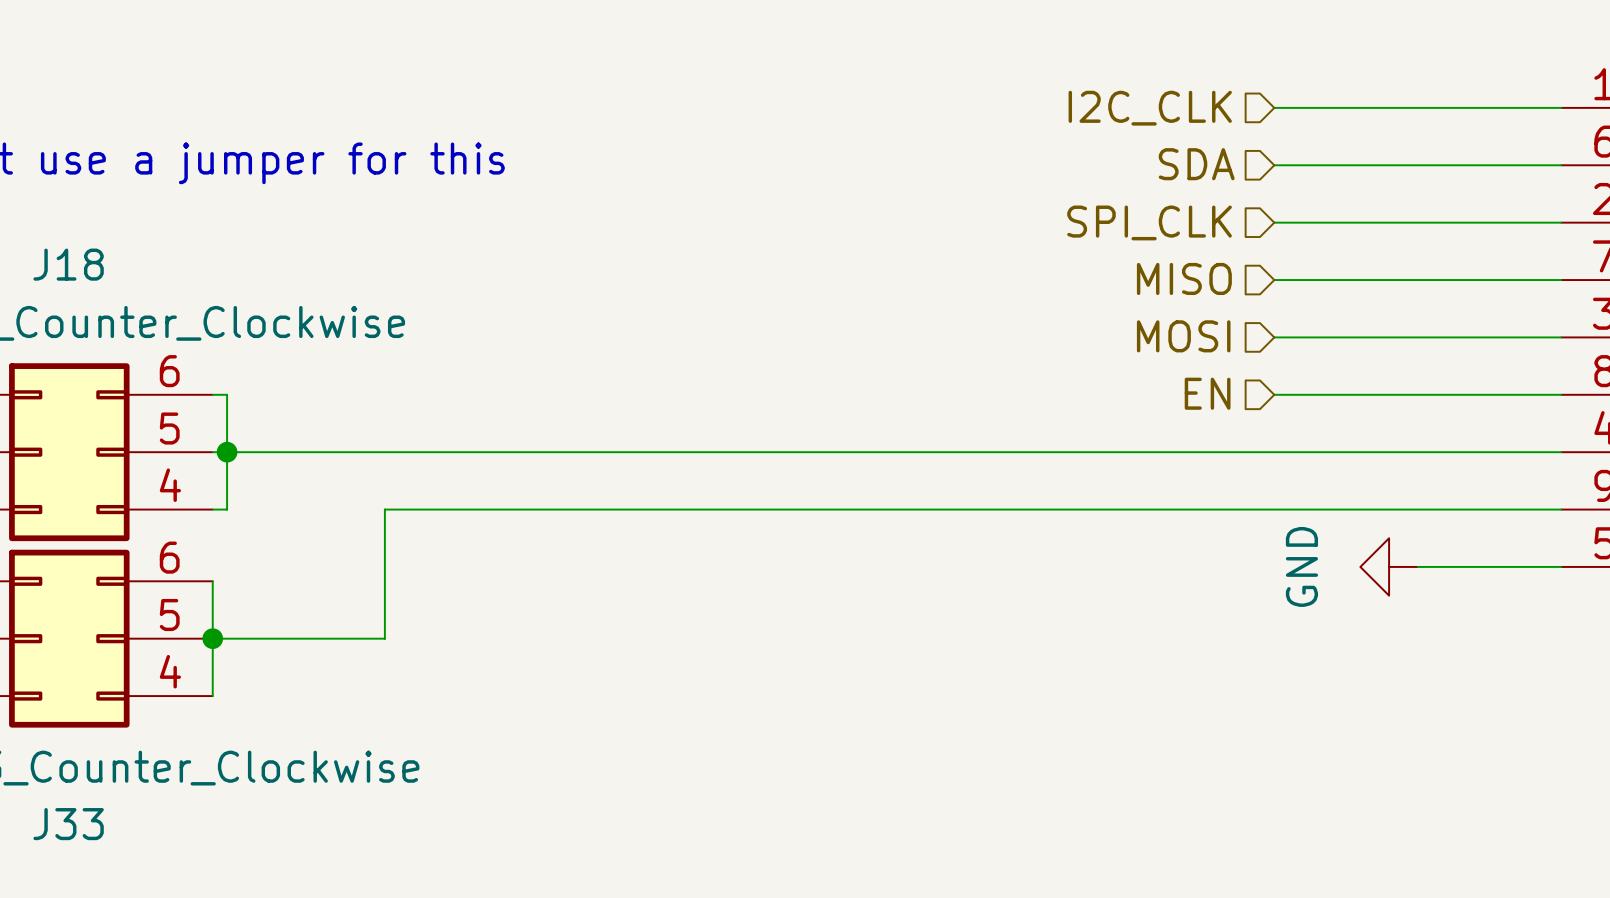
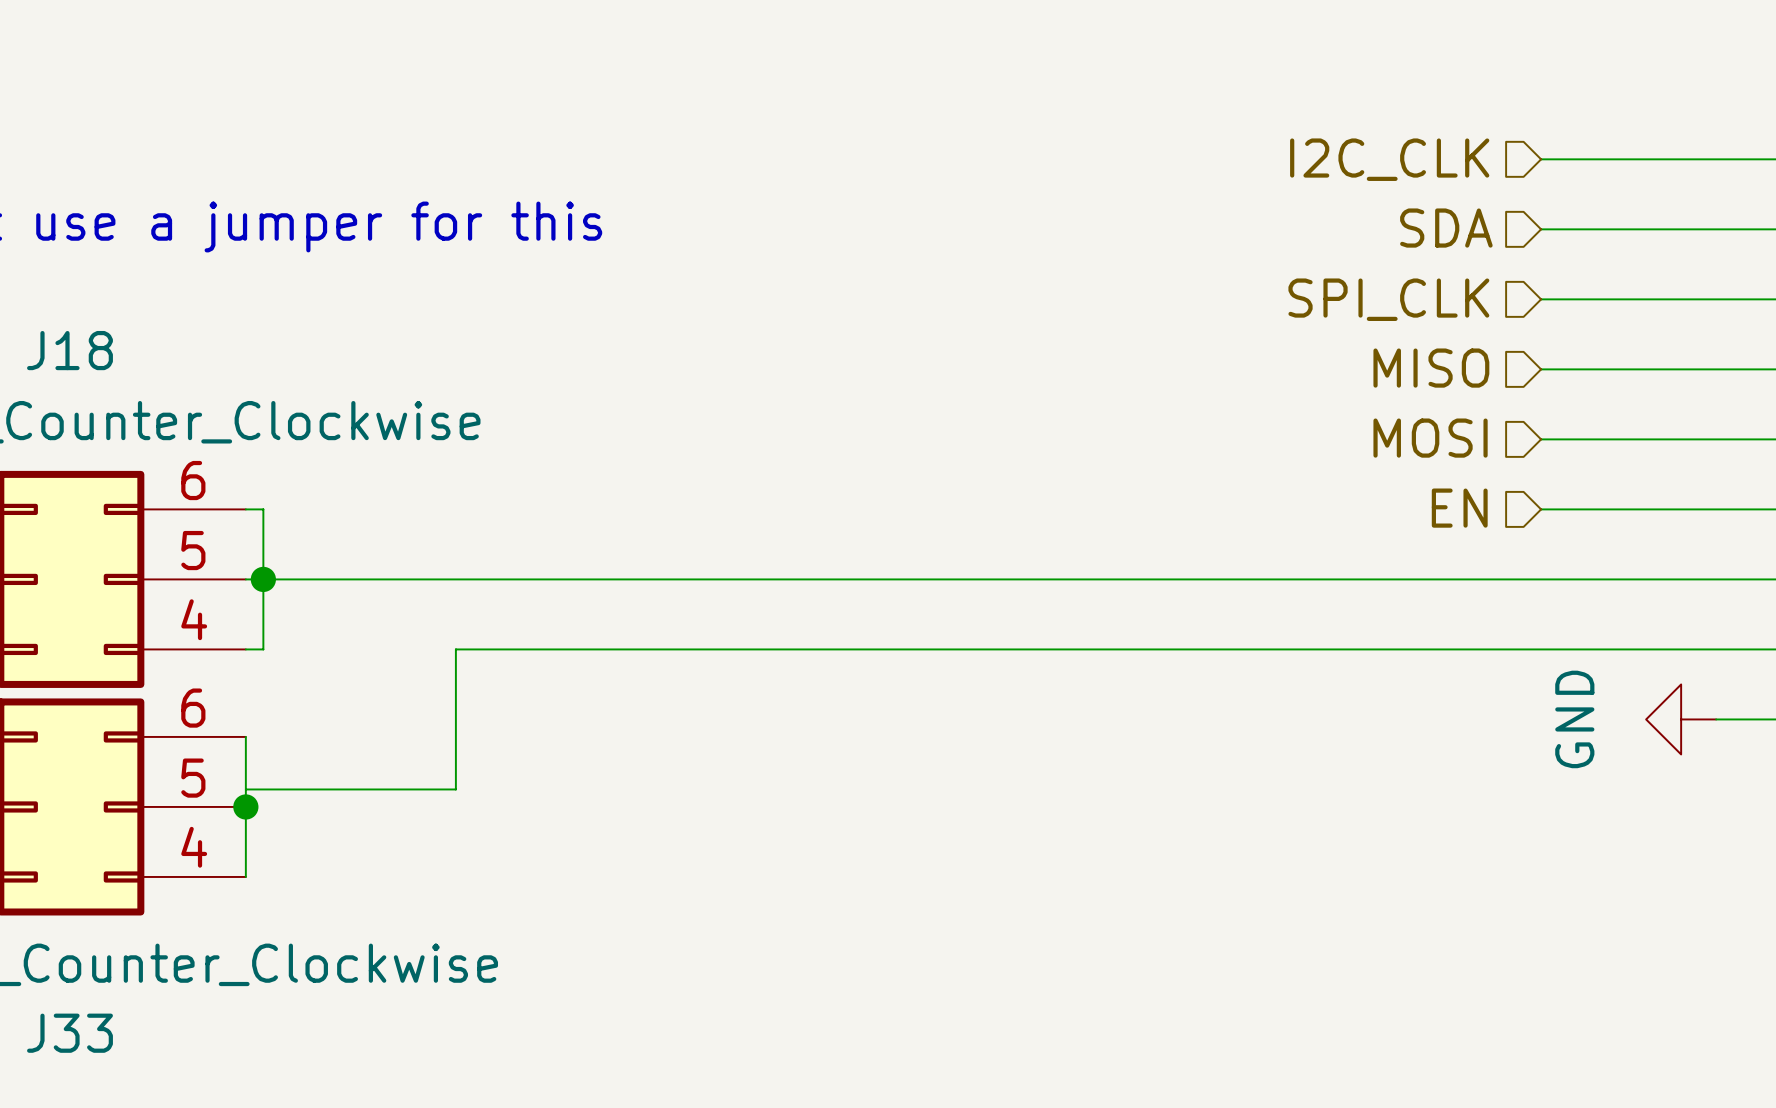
wire: (384, 624) (384, 638) (212, 638) -> (455, 789) (245, 789)

